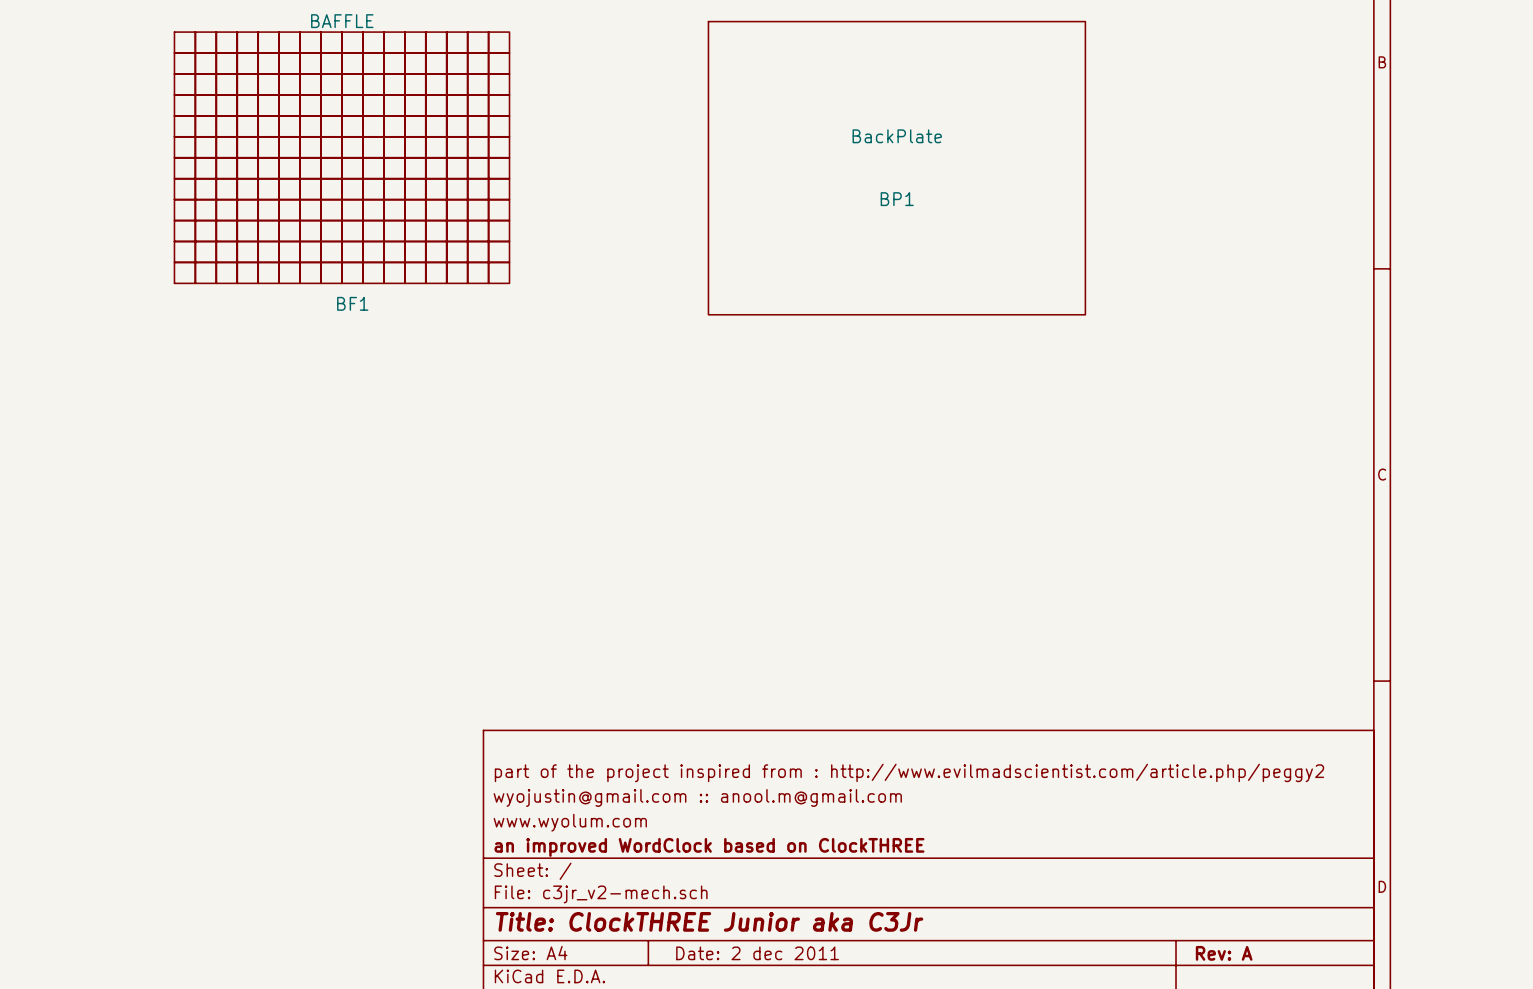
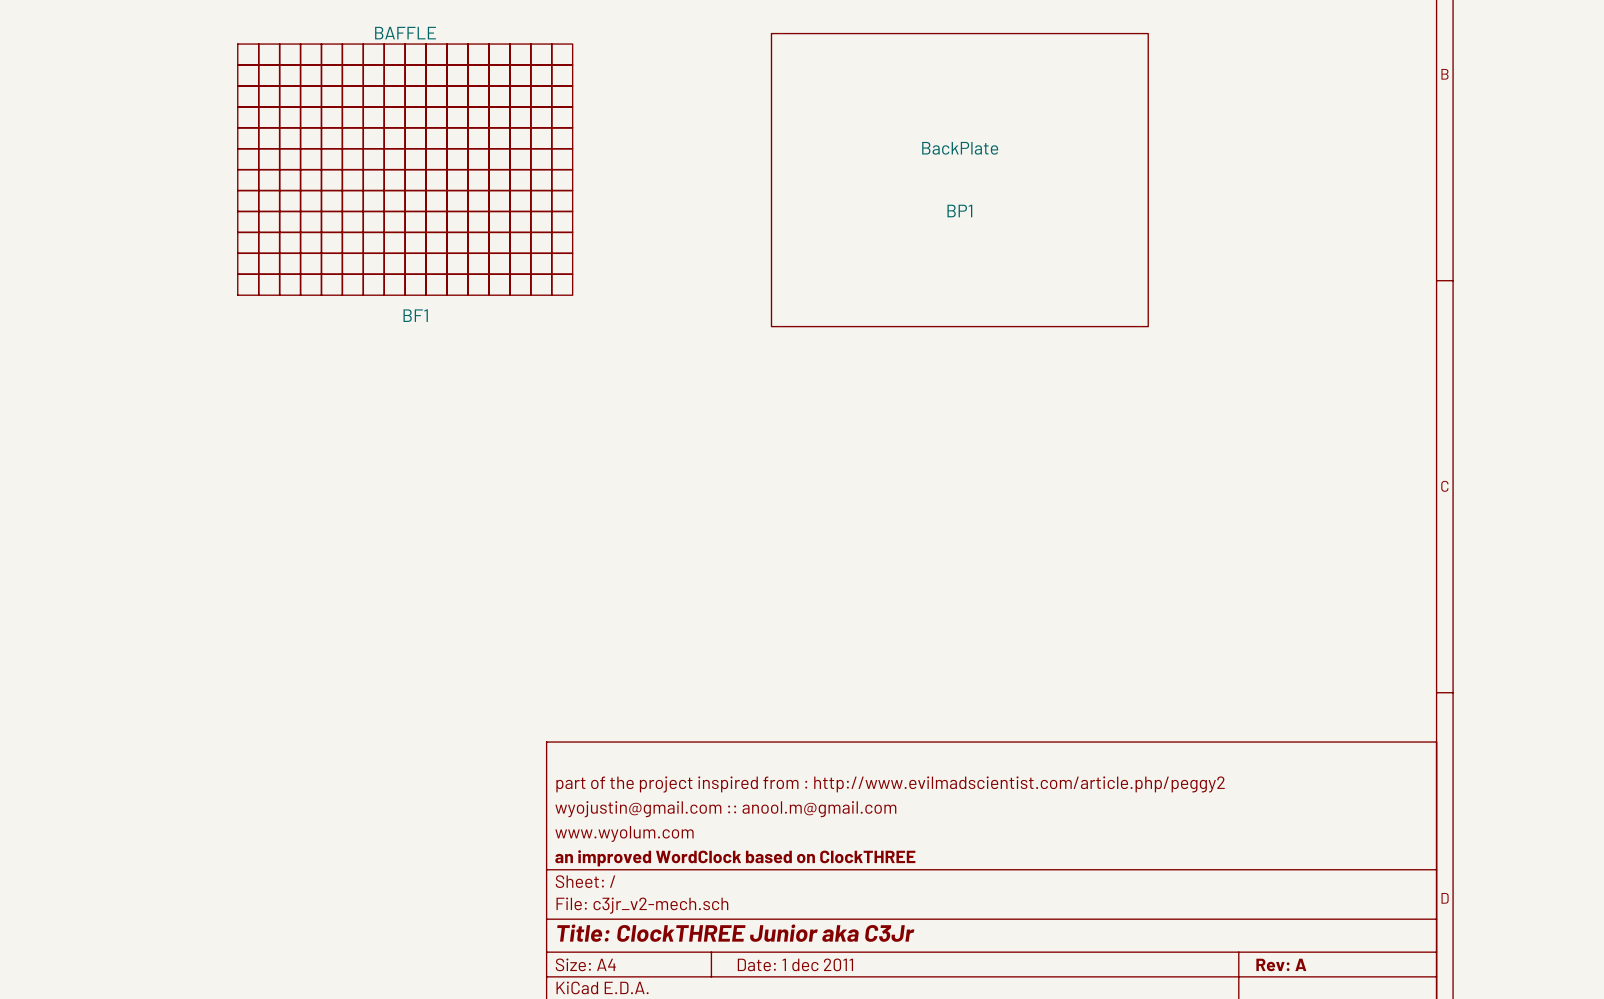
title block: Date: 2 dec 2011 (757, 953) -> Date: 1 dec 2011 (795, 964)

